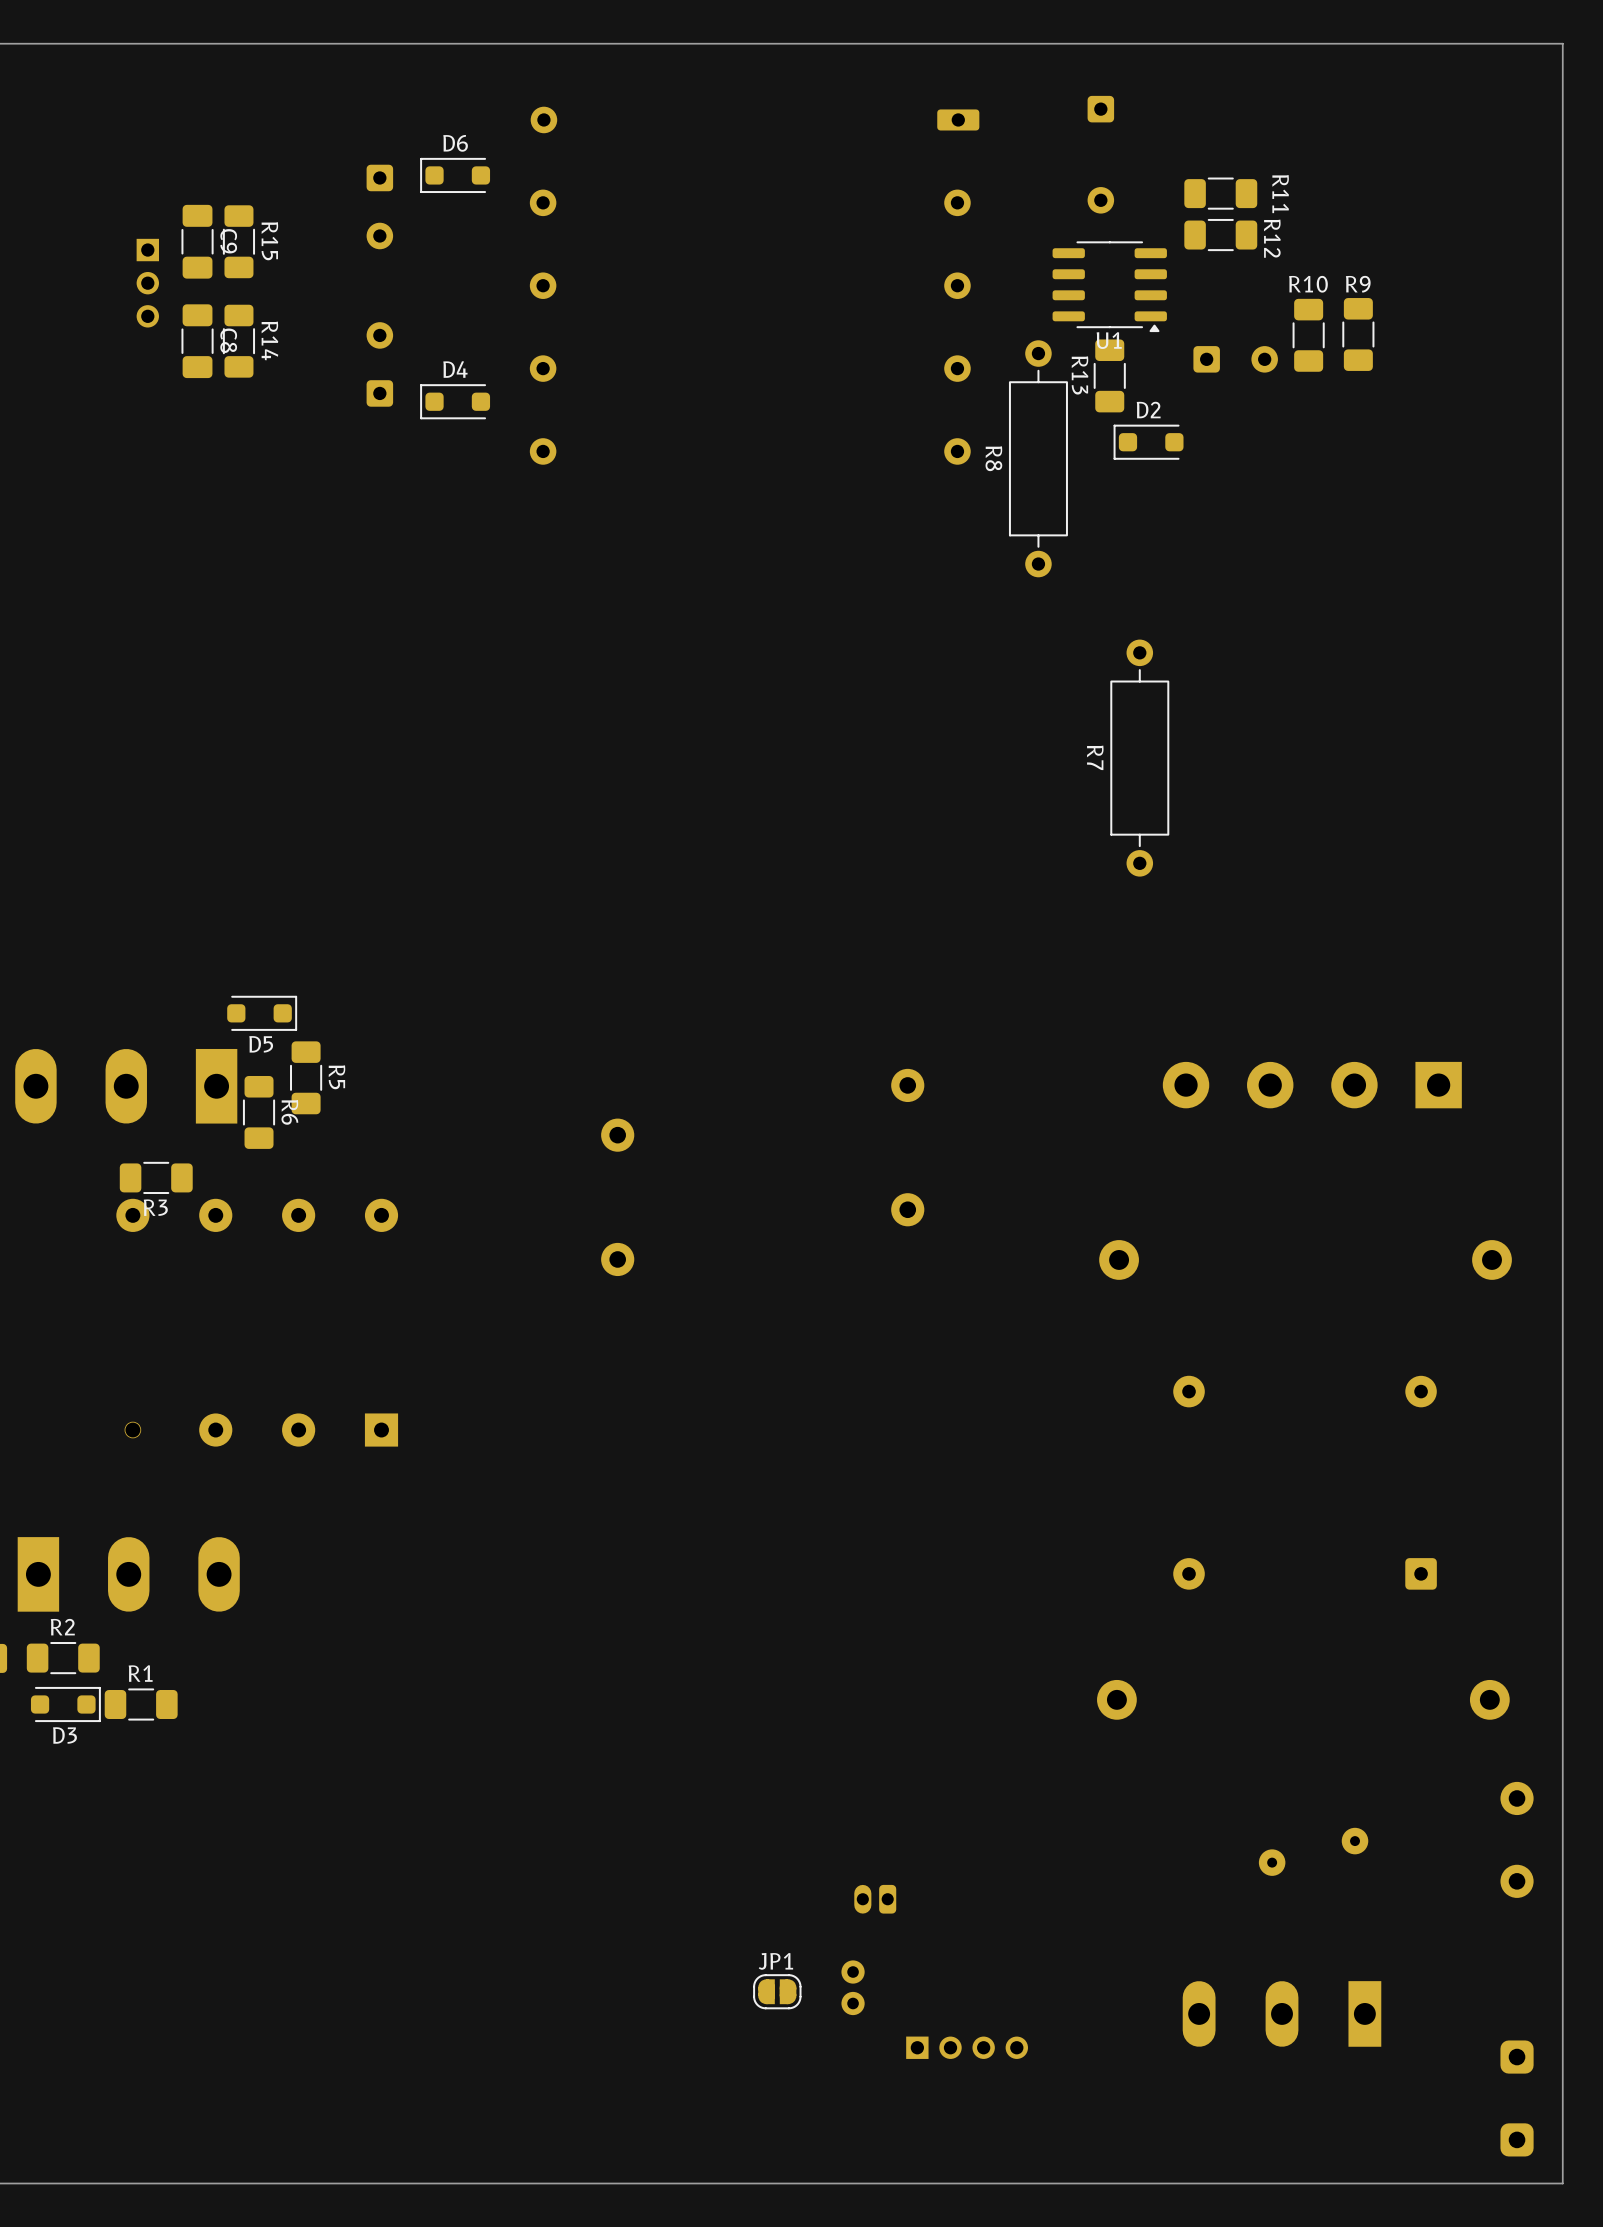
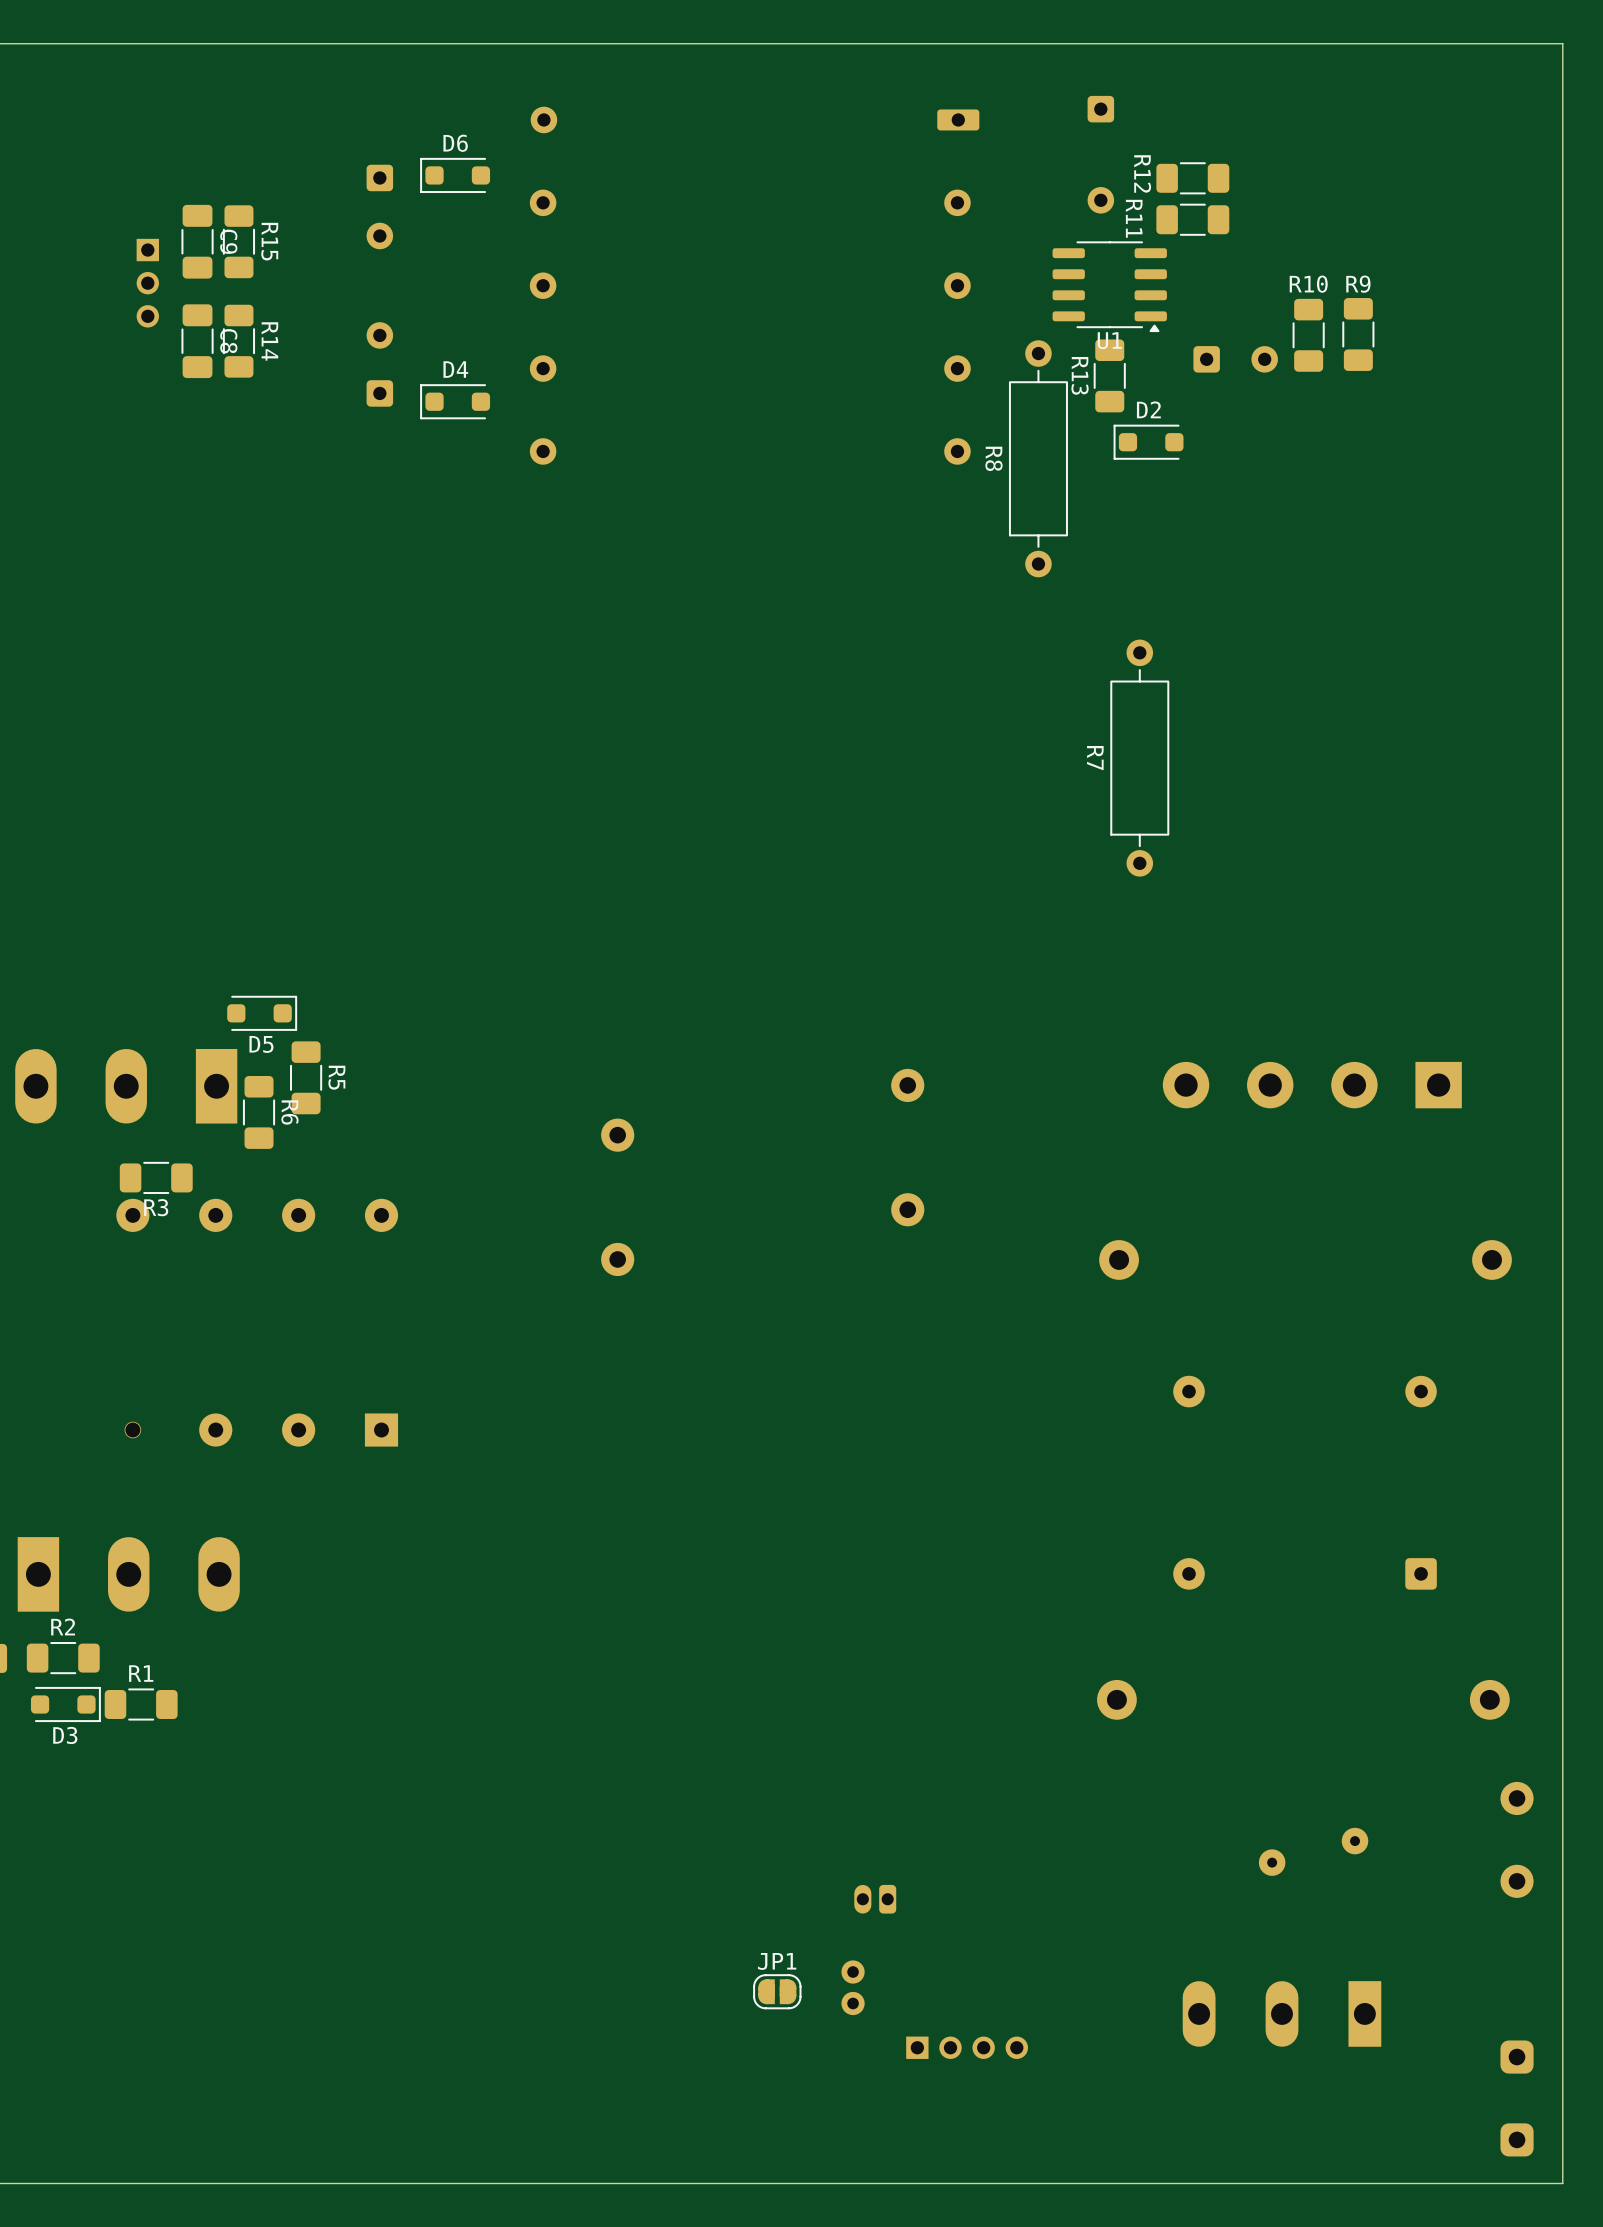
R11 position: (1220, 193) -> (1192, 219)
R11 name position: R11 (1280, 194) -> R11 (1134, 218)
R12 position: (1220, 235) -> (1192, 178)
R12 name position: R12 (1272, 238) -> R12 (1142, 173)

